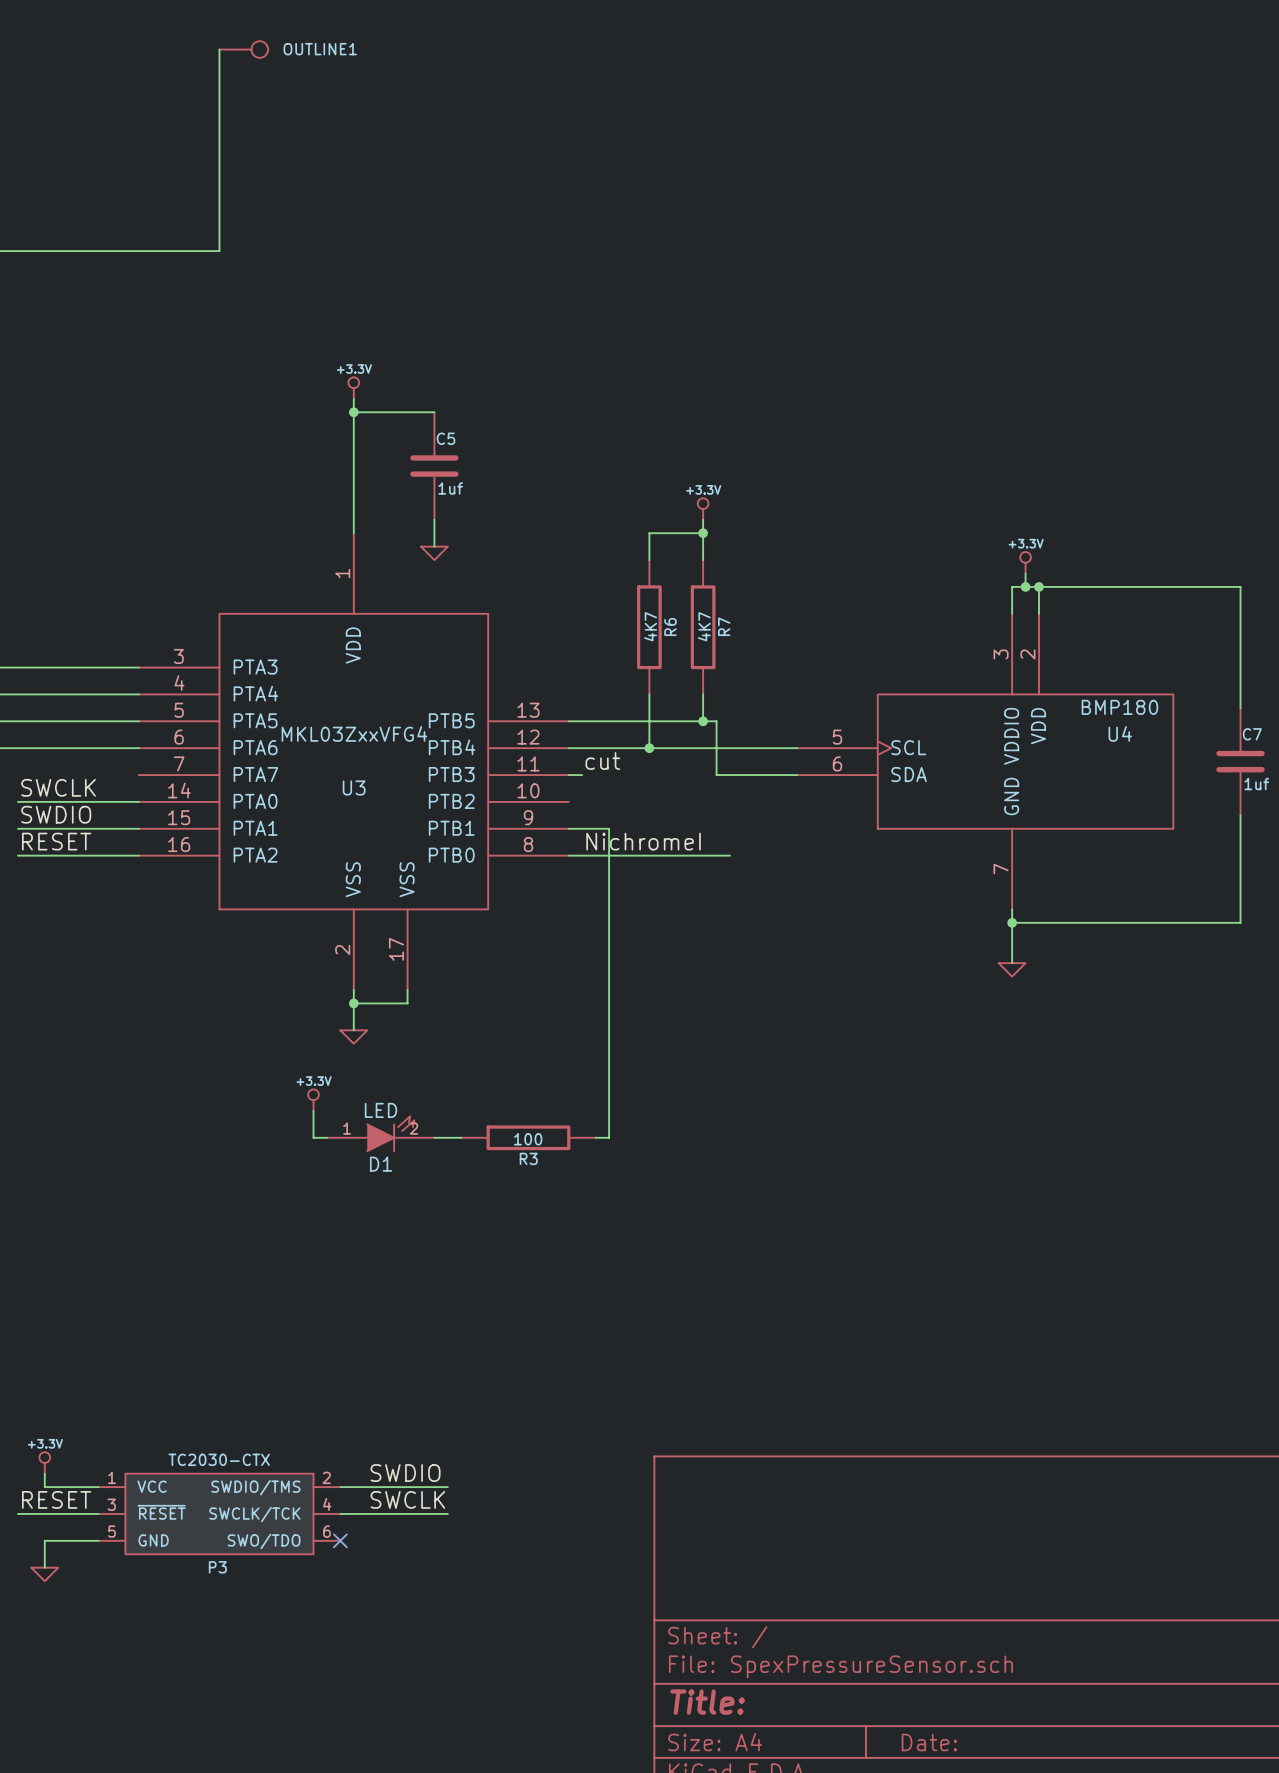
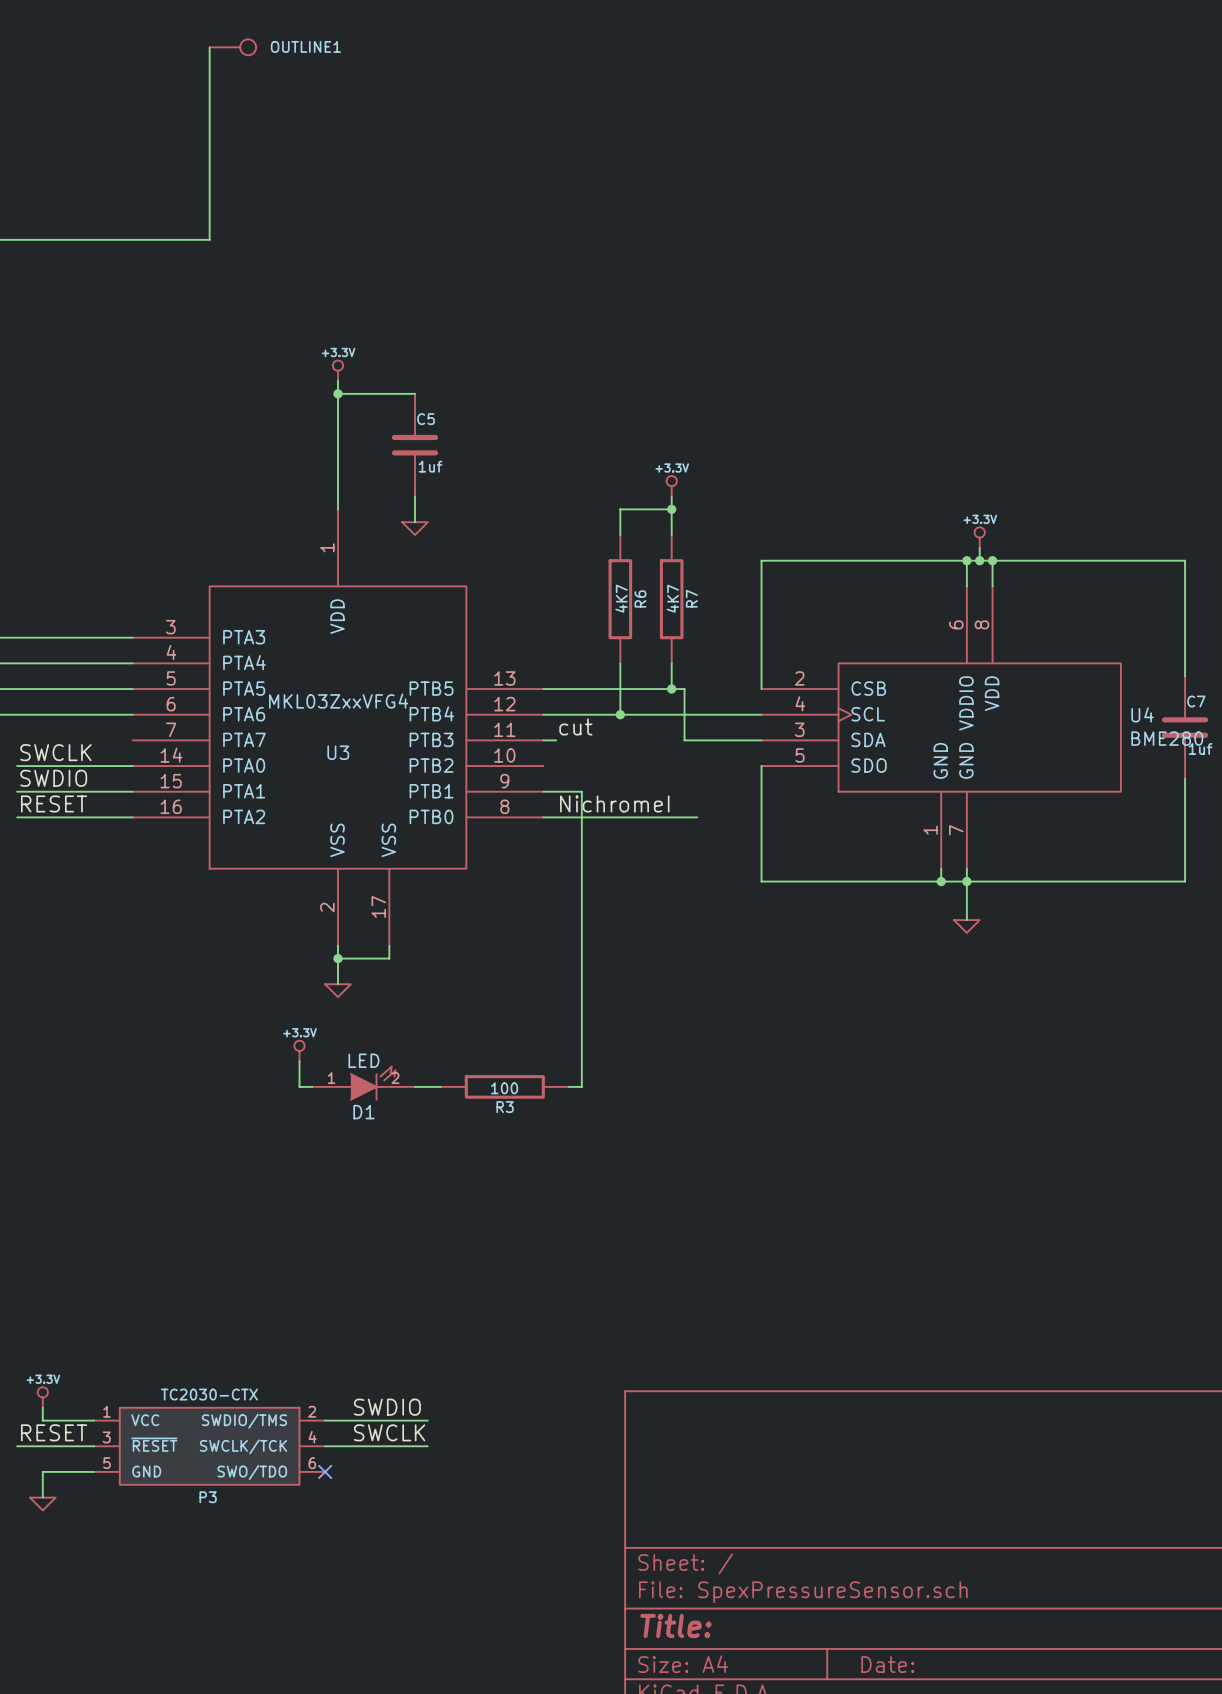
wire: none -> (966, 560) (761, 560) (761, 689)
junction: none -> (966, 560)
U4 symbol: [797, 613, 1174, 910] -> [761, 586, 1121, 869]
U4 value: BMP180 (1119, 707) -> BME280 (1167, 738)
U4 name position: U4 (1120, 733) -> U4 (1142, 714)
wire: none -> (761, 766) (761, 881) (966, 881)
wire: none -> (941, 868) (941, 881)
junction: none -> (941, 881)

